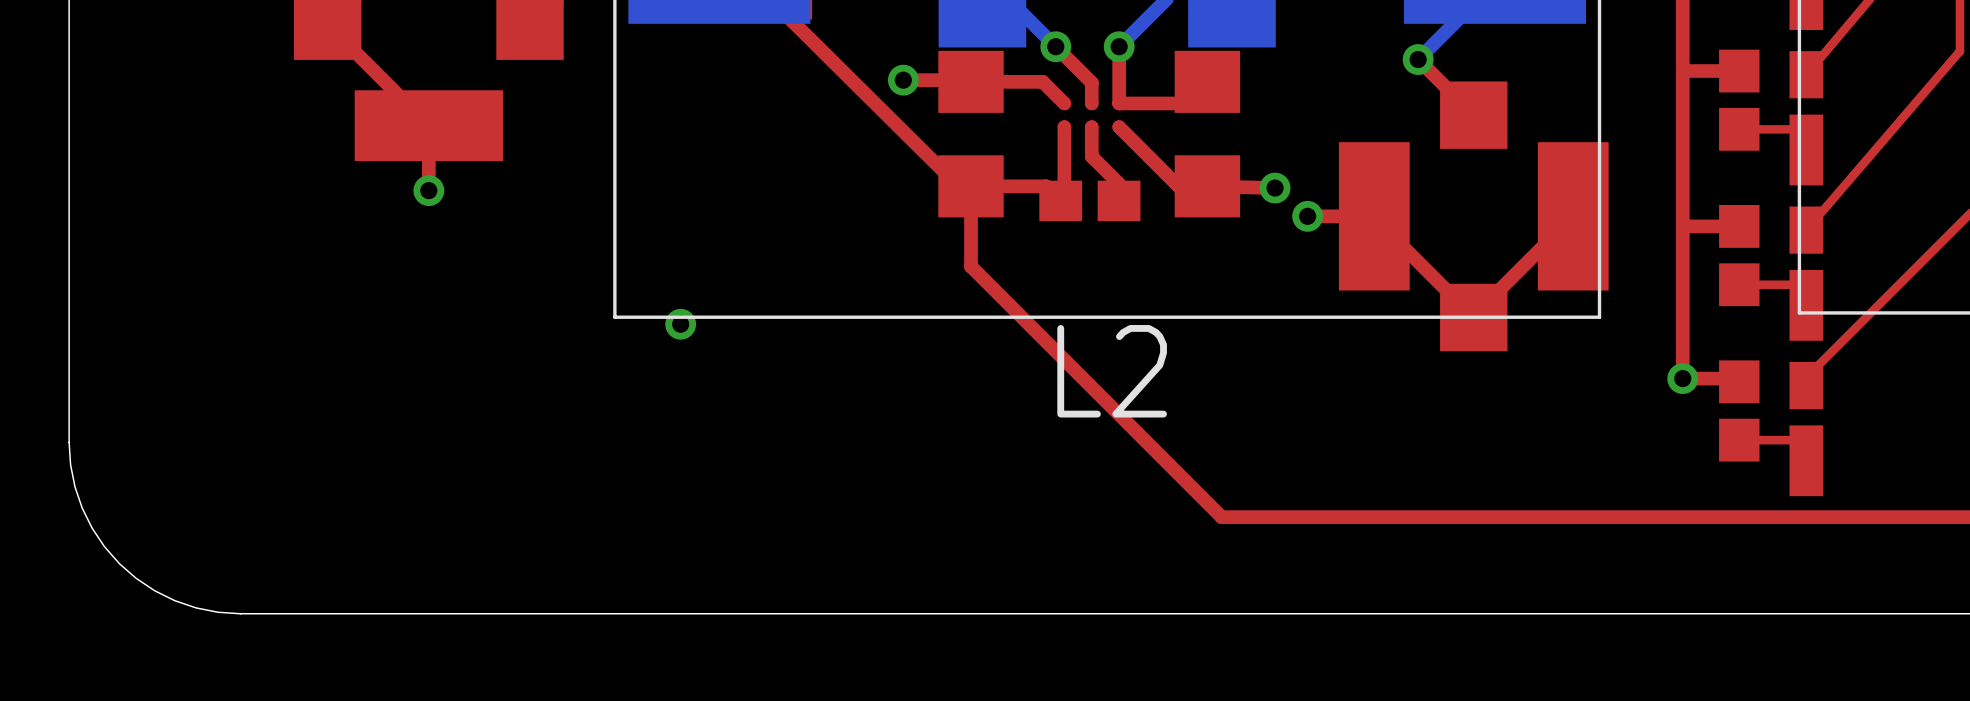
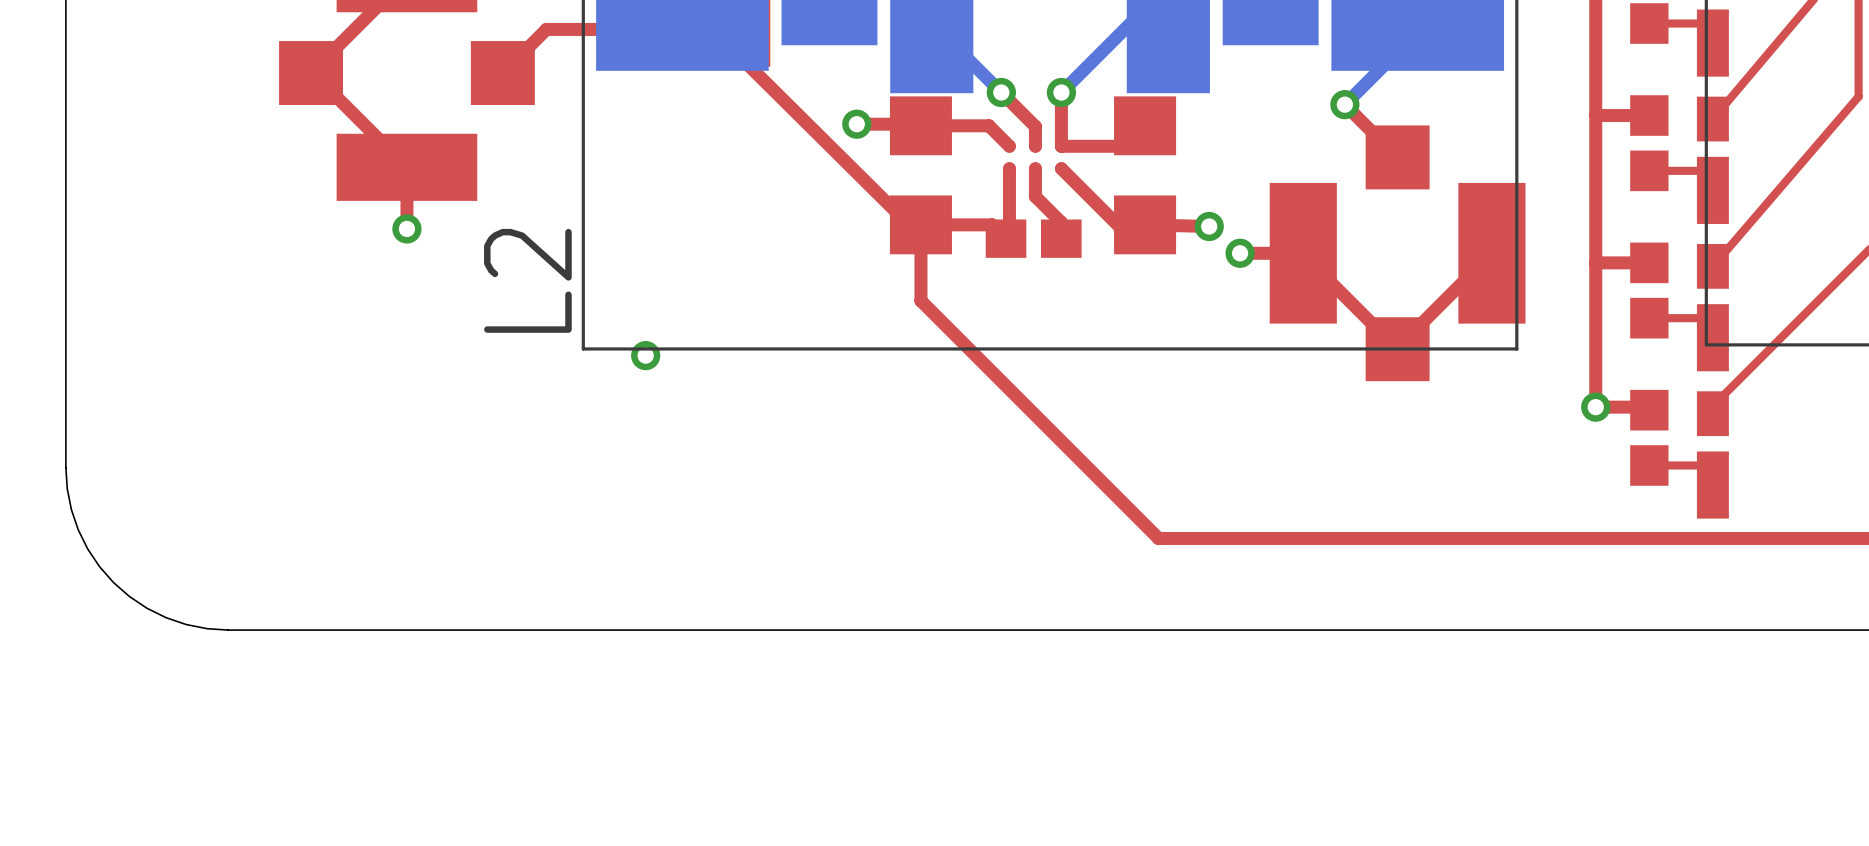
L2 name rotation: 0° (1112, 371) -> 90° counterclockwise (527, 280)
L2 name position: L2 (1112, 371) -> L2 (527, 280)

